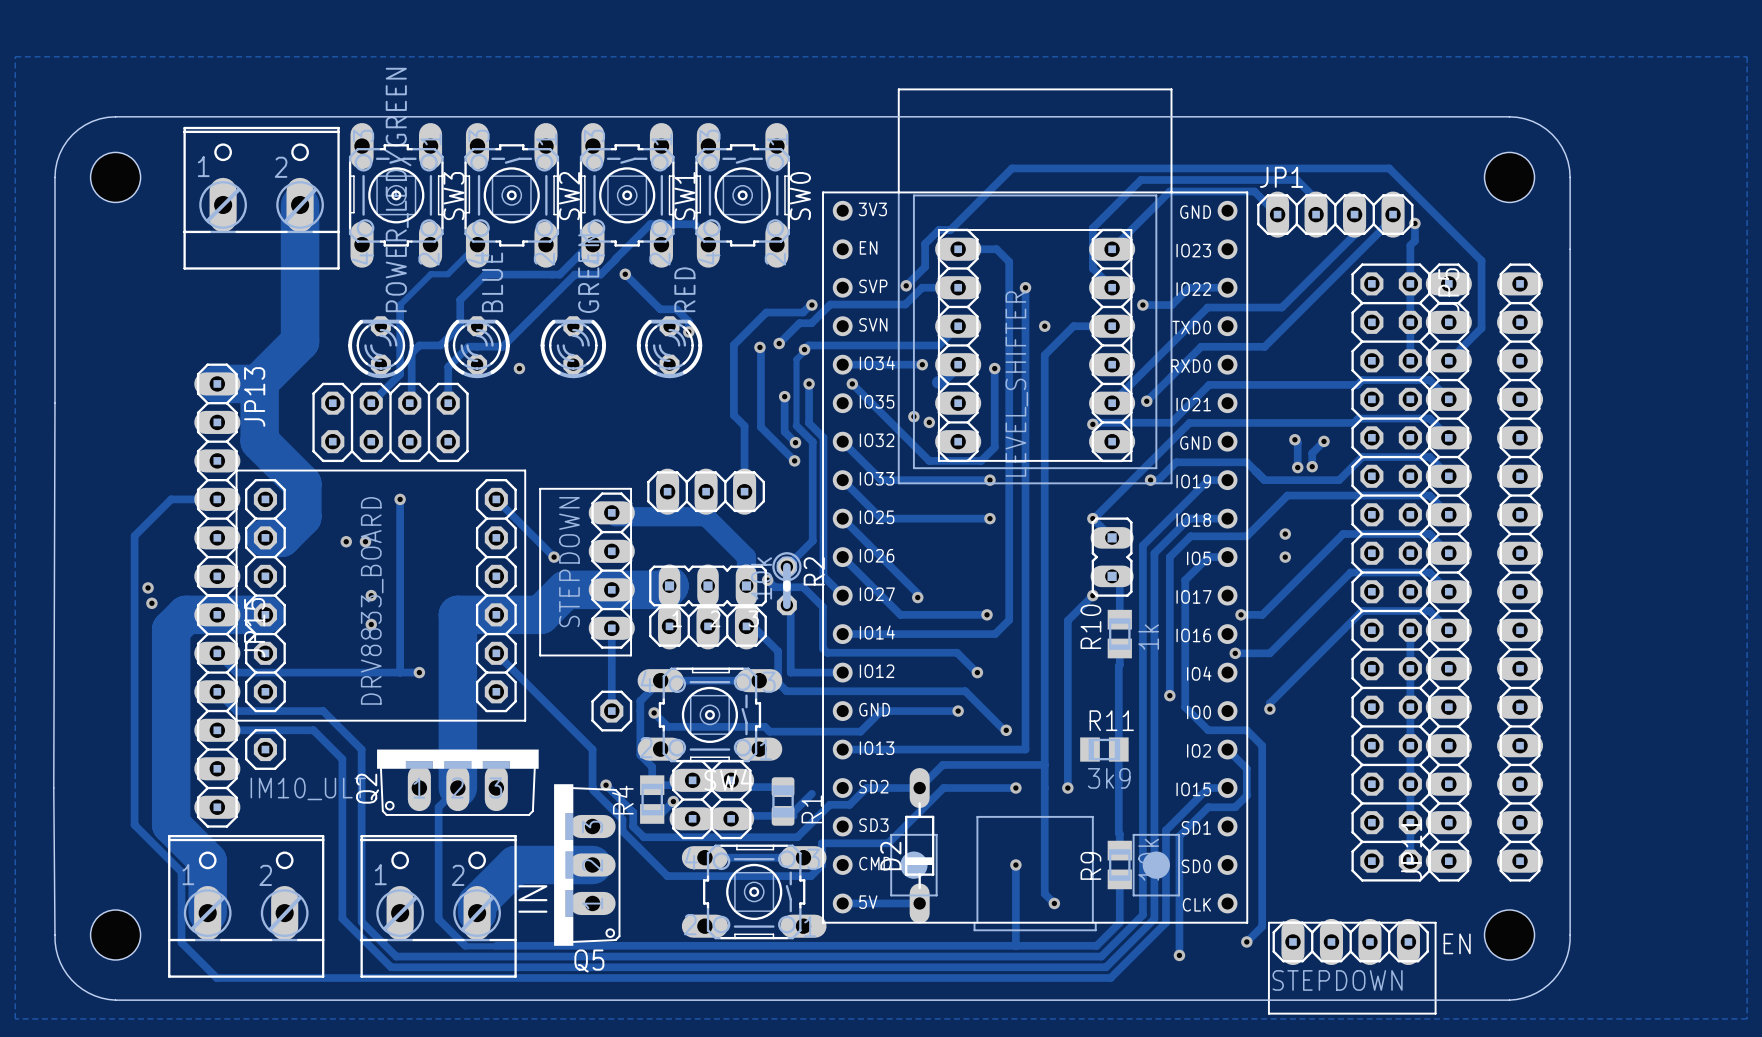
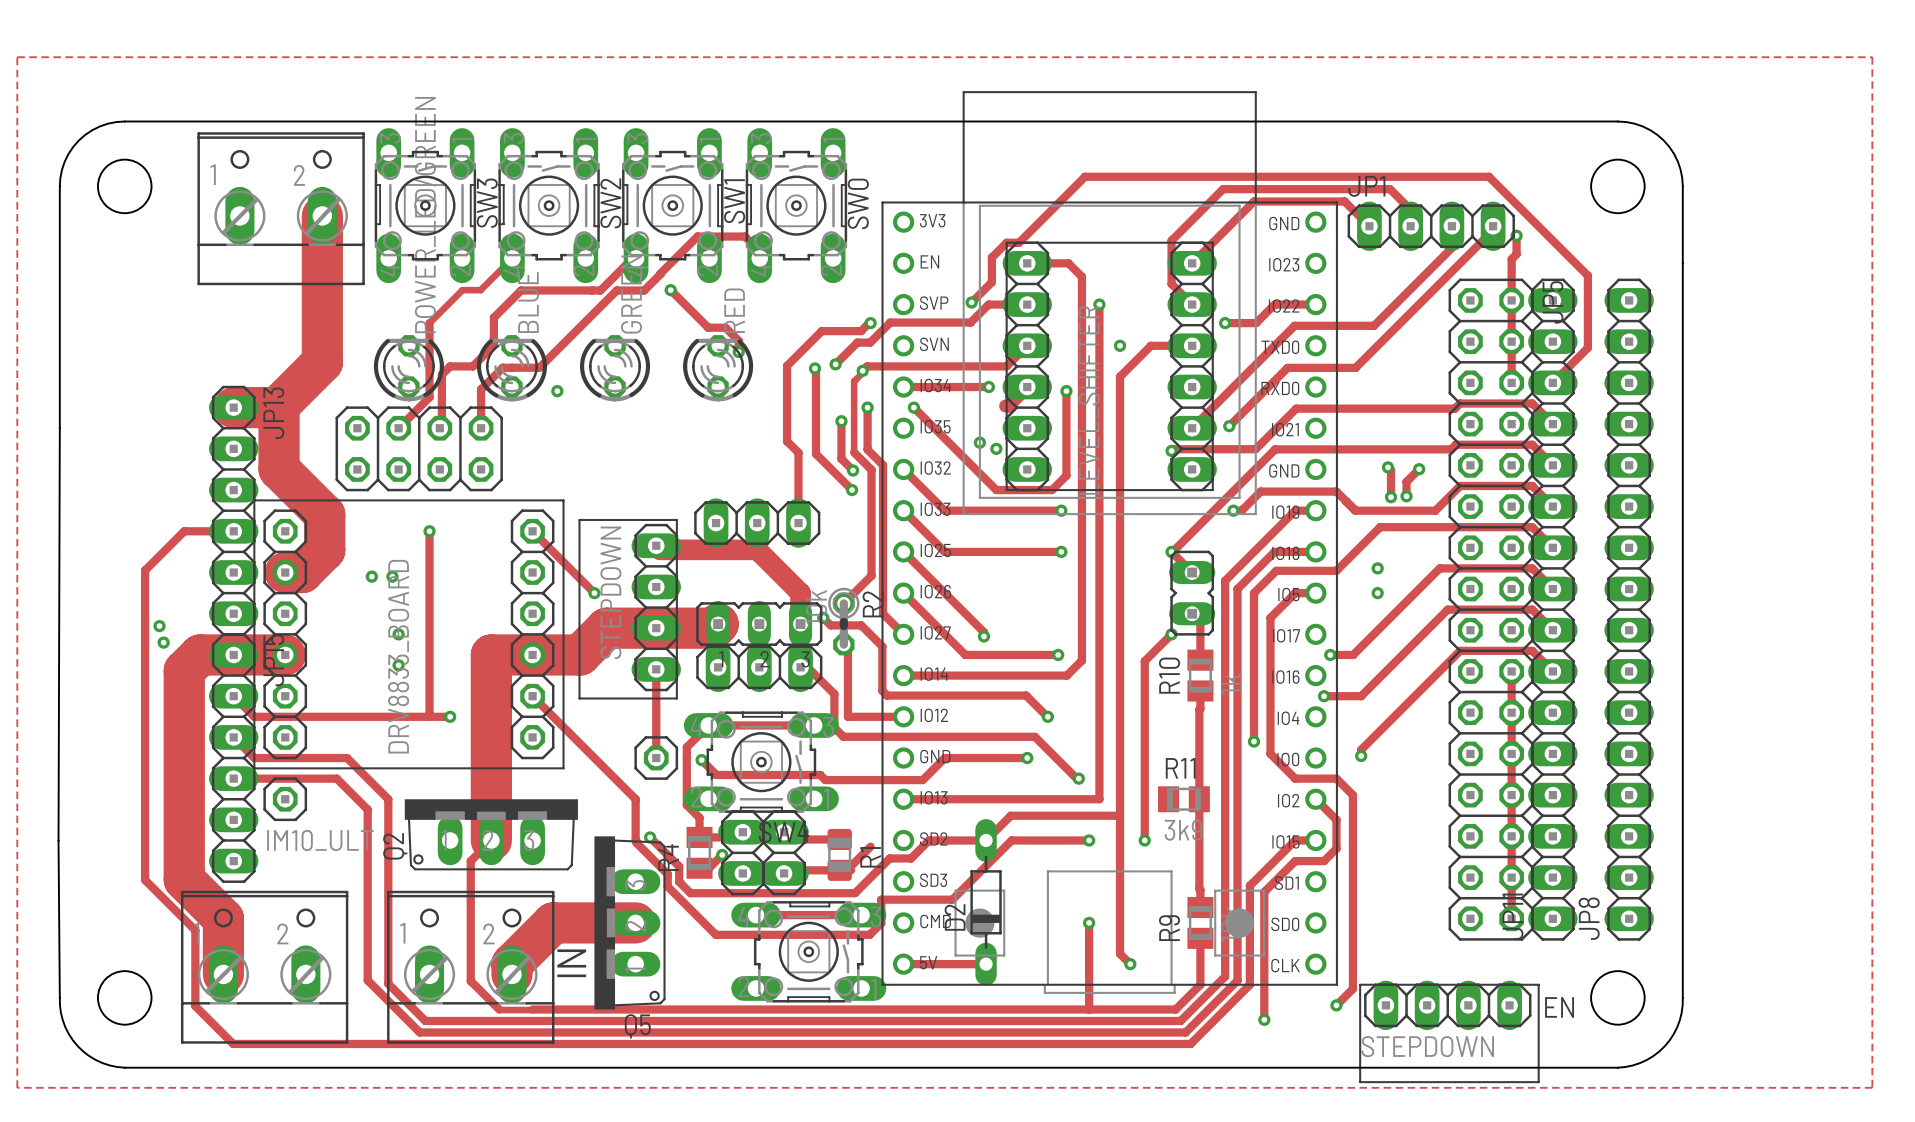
JP8 name: none -> JP8 (1589, 918)

